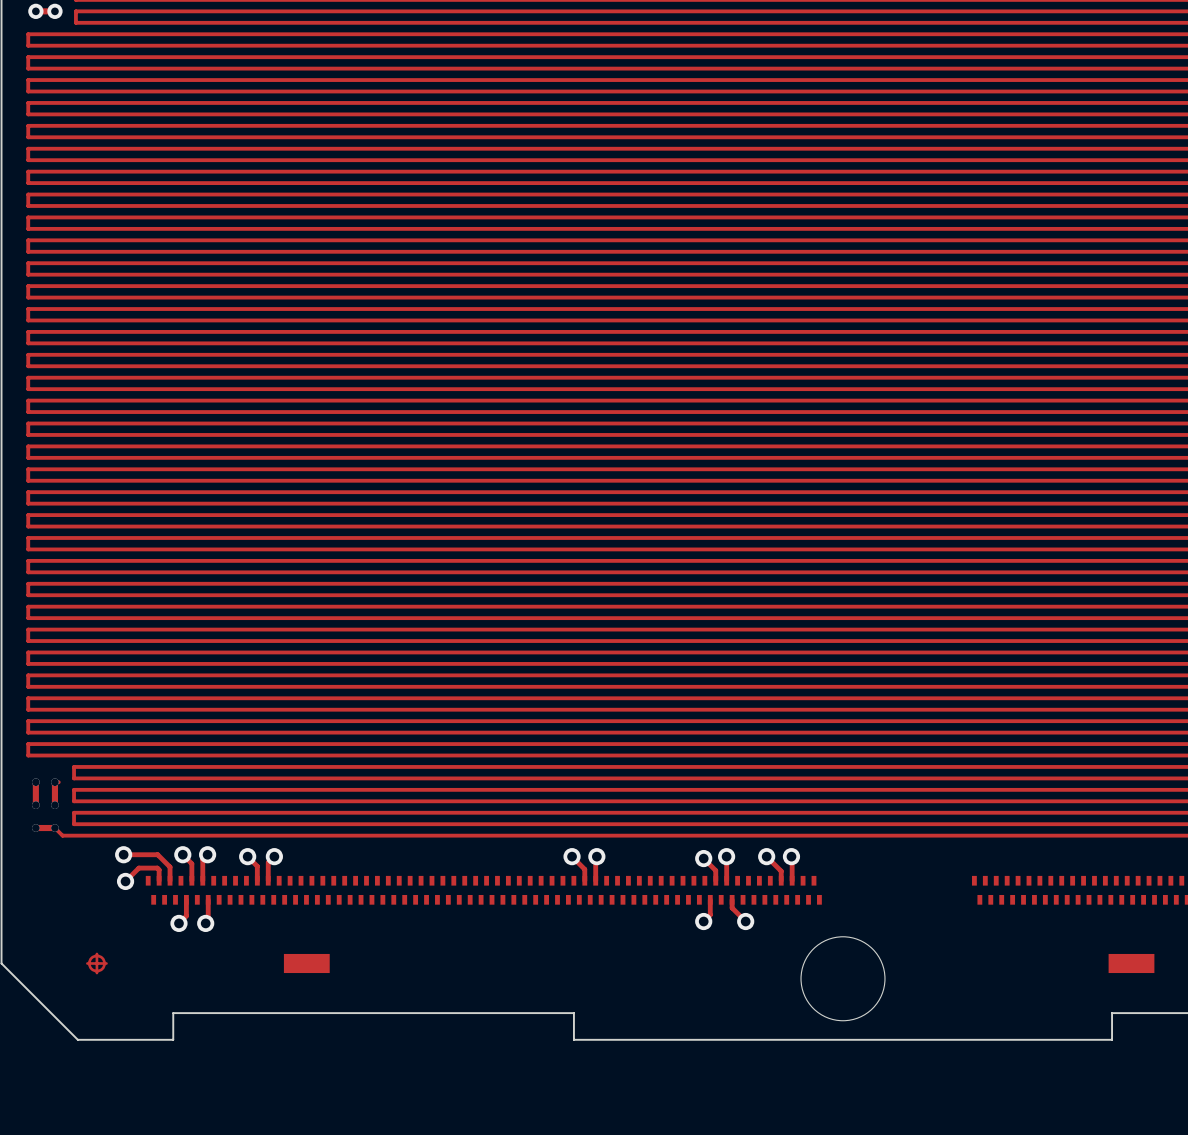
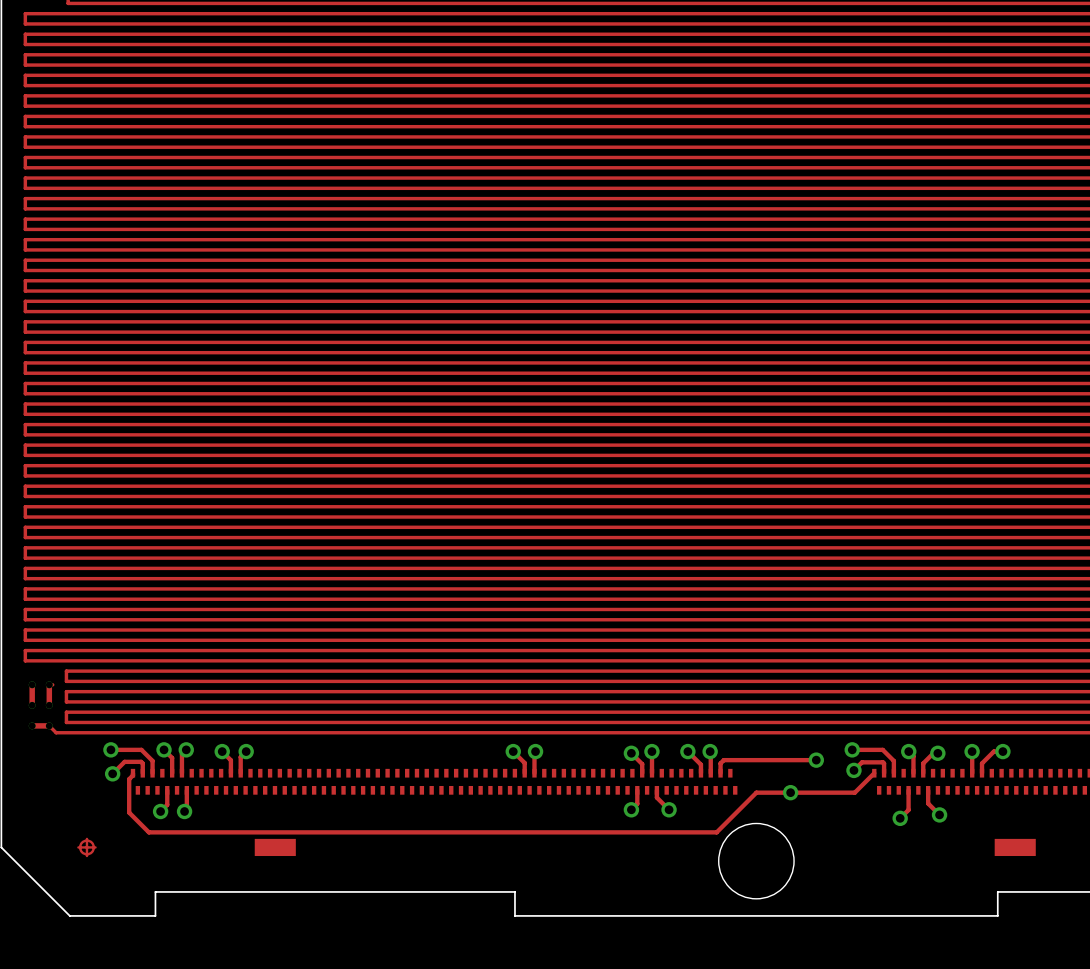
track: none -> (852, 749) (882, 749) (893, 760) (893, 773)
via: none -> (852, 749)
track: none -> (908, 751) (913, 756) (913, 773)
via: none -> (908, 751)
track: none -> (972, 751) (972, 773)
via: none -> (972, 751)
track: none -> (1002, 751) (993, 751) (982, 763) (982, 773)
via: none -> (1002, 751)
track: none -> (937, 753) (933, 753) (923, 763) (923, 773)
via: none -> (937, 753)
track: none -> (816, 760) (723, 760) (720, 763) (720, 773)
via: none -> (816, 760)
track: none -> (853, 770) (862, 762) (882, 762) (884, 773)
via: none -> (853, 770)
track: none -> (132, 773) (129, 779) (129, 812) (148, 832) (716, 832) (756, 792) (854, 792) (874, 773)
track: none -> (908, 790) (908, 809) (900, 818)
track: none -> (928, 790) (928, 803) (939, 814)
via: none -> (790, 792)
via: none -> (939, 814)
via: none -> (900, 818)

